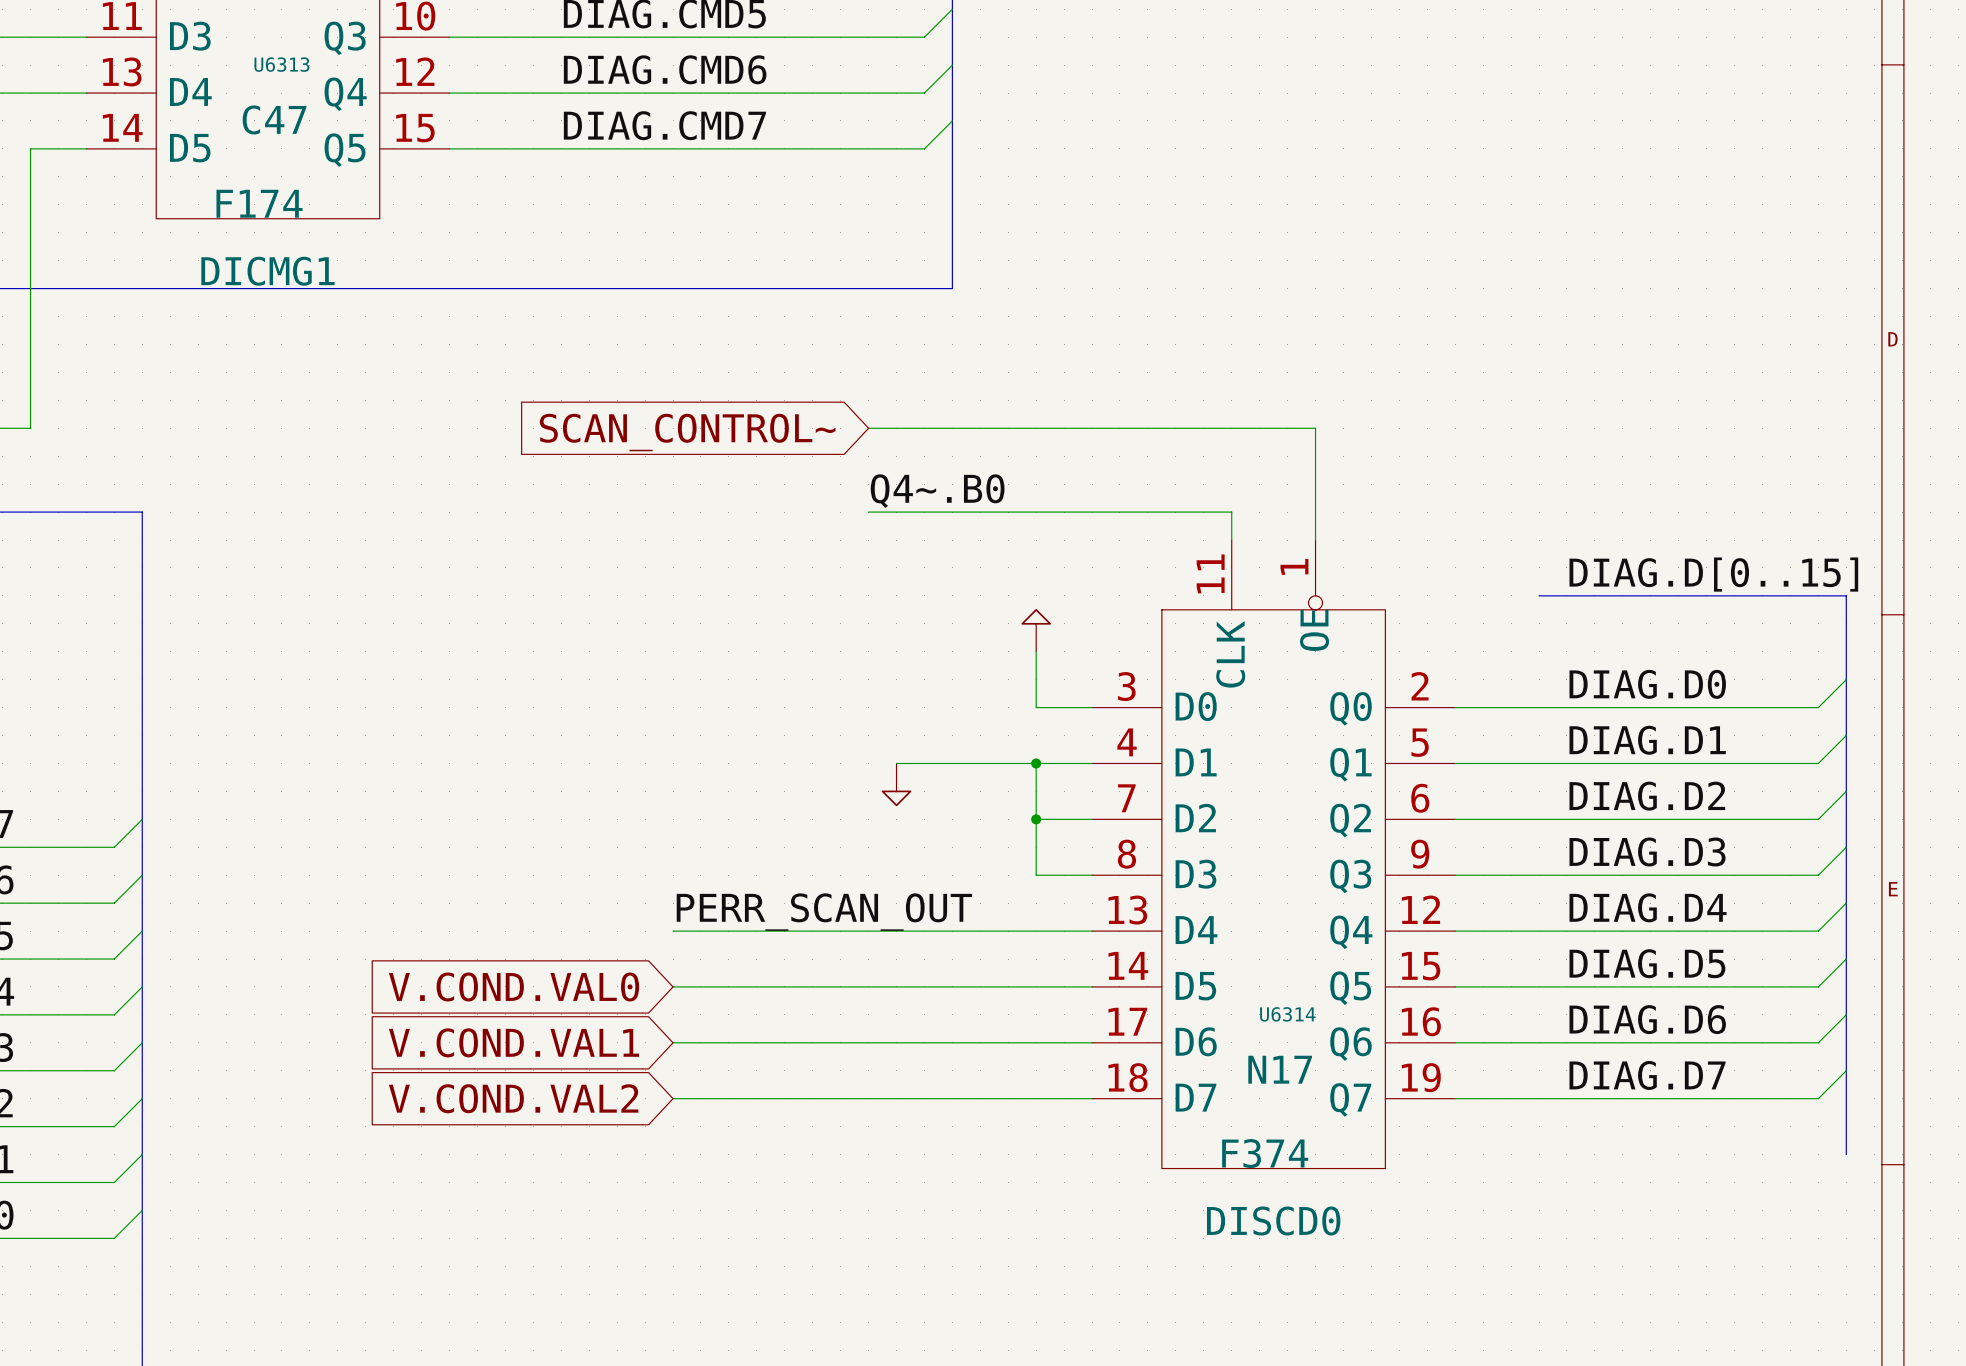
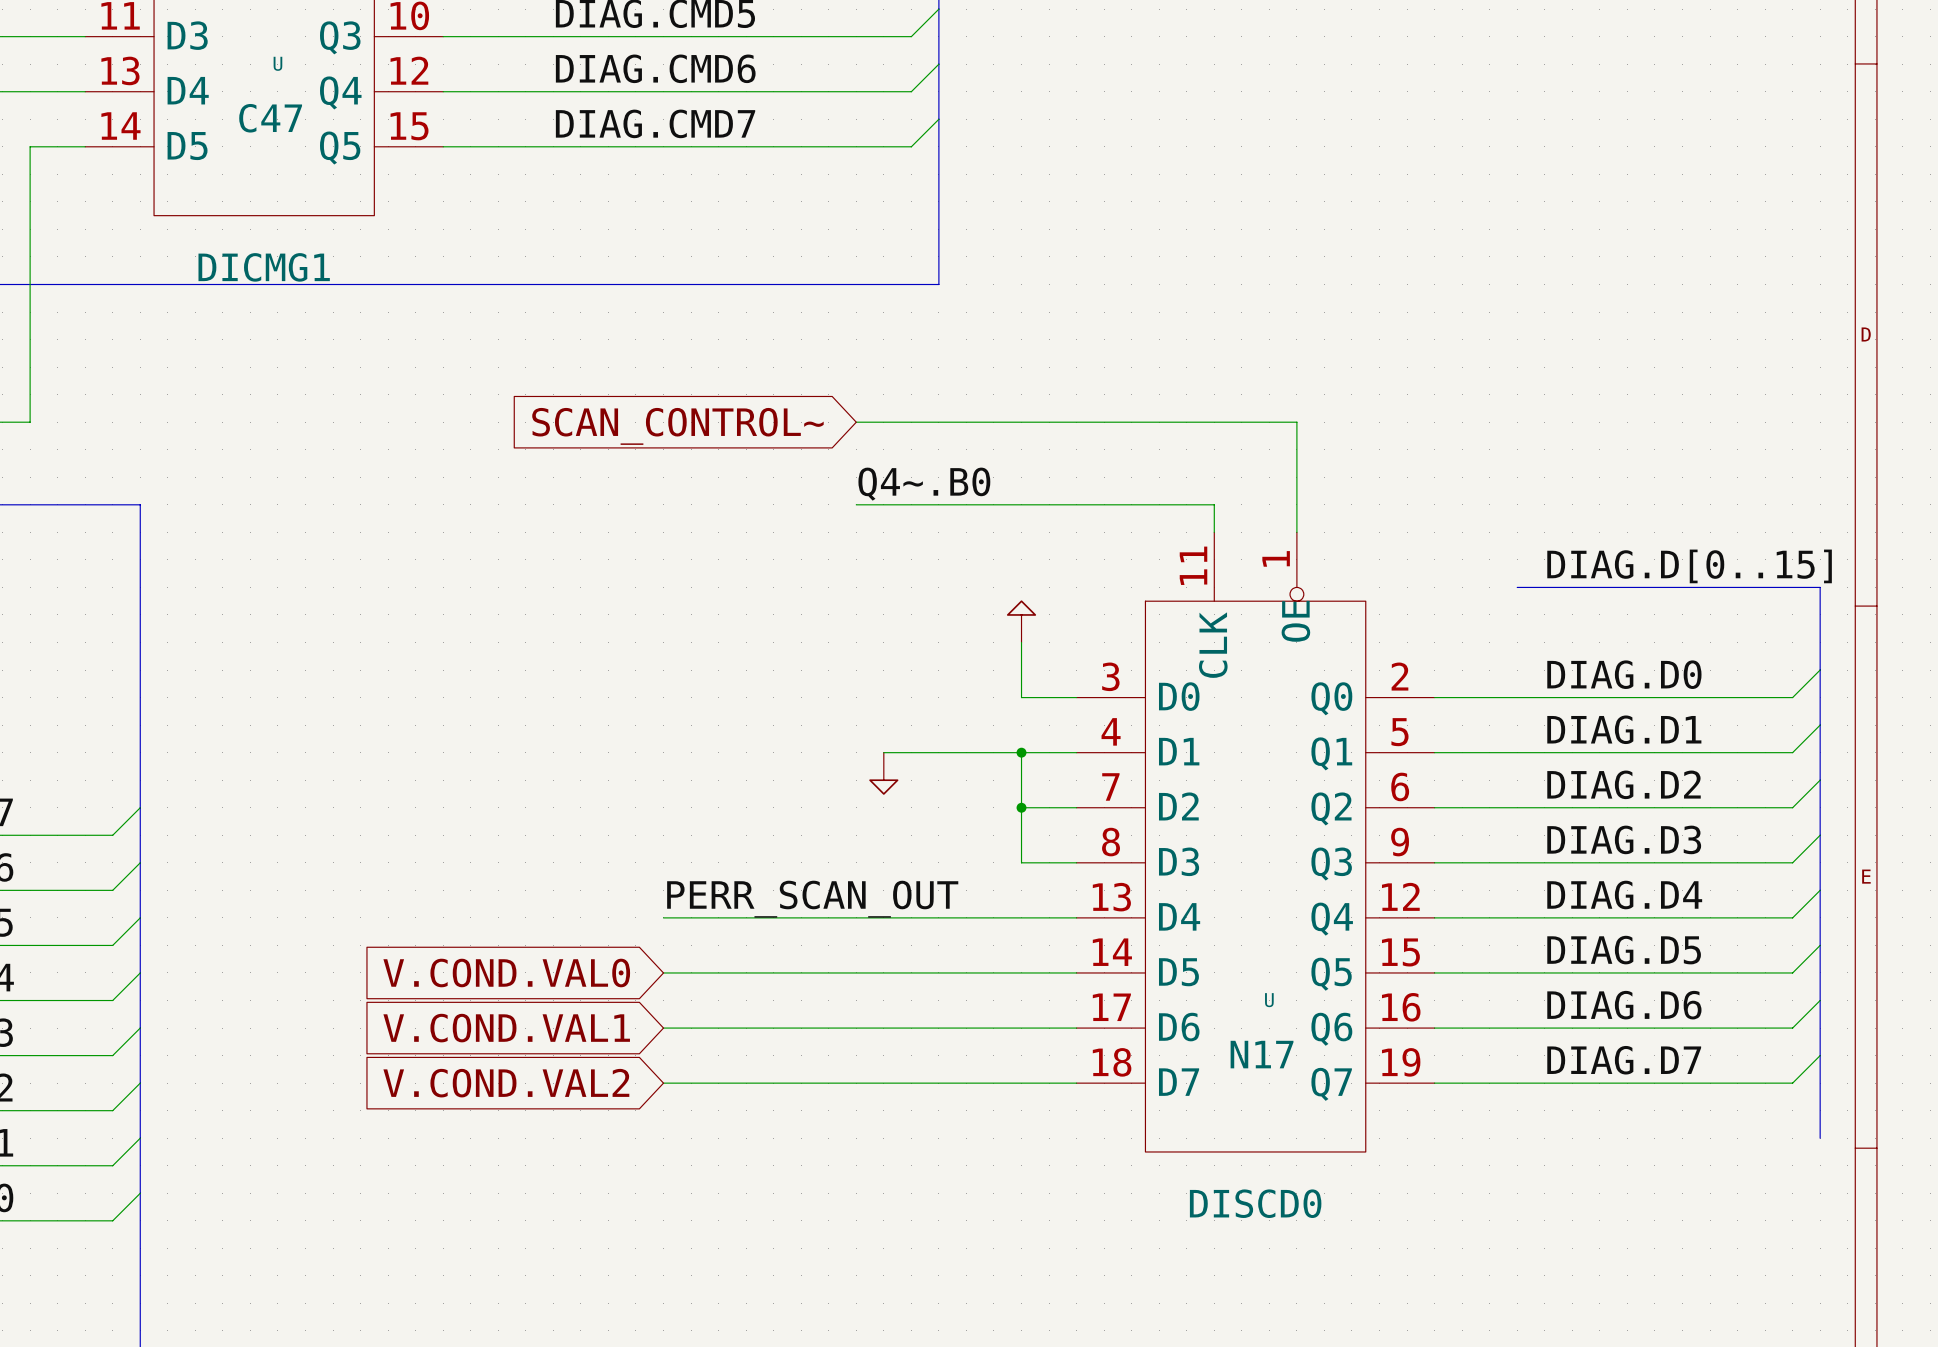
U6313 name: U6313 (281, 64) -> U (277, 63)
U6313 value: F174 (259, 203) -> none
U6314 name: U6314 (1287, 1014) -> U (1269, 1000)
U6314 value: F374 (1265, 1153) -> none

